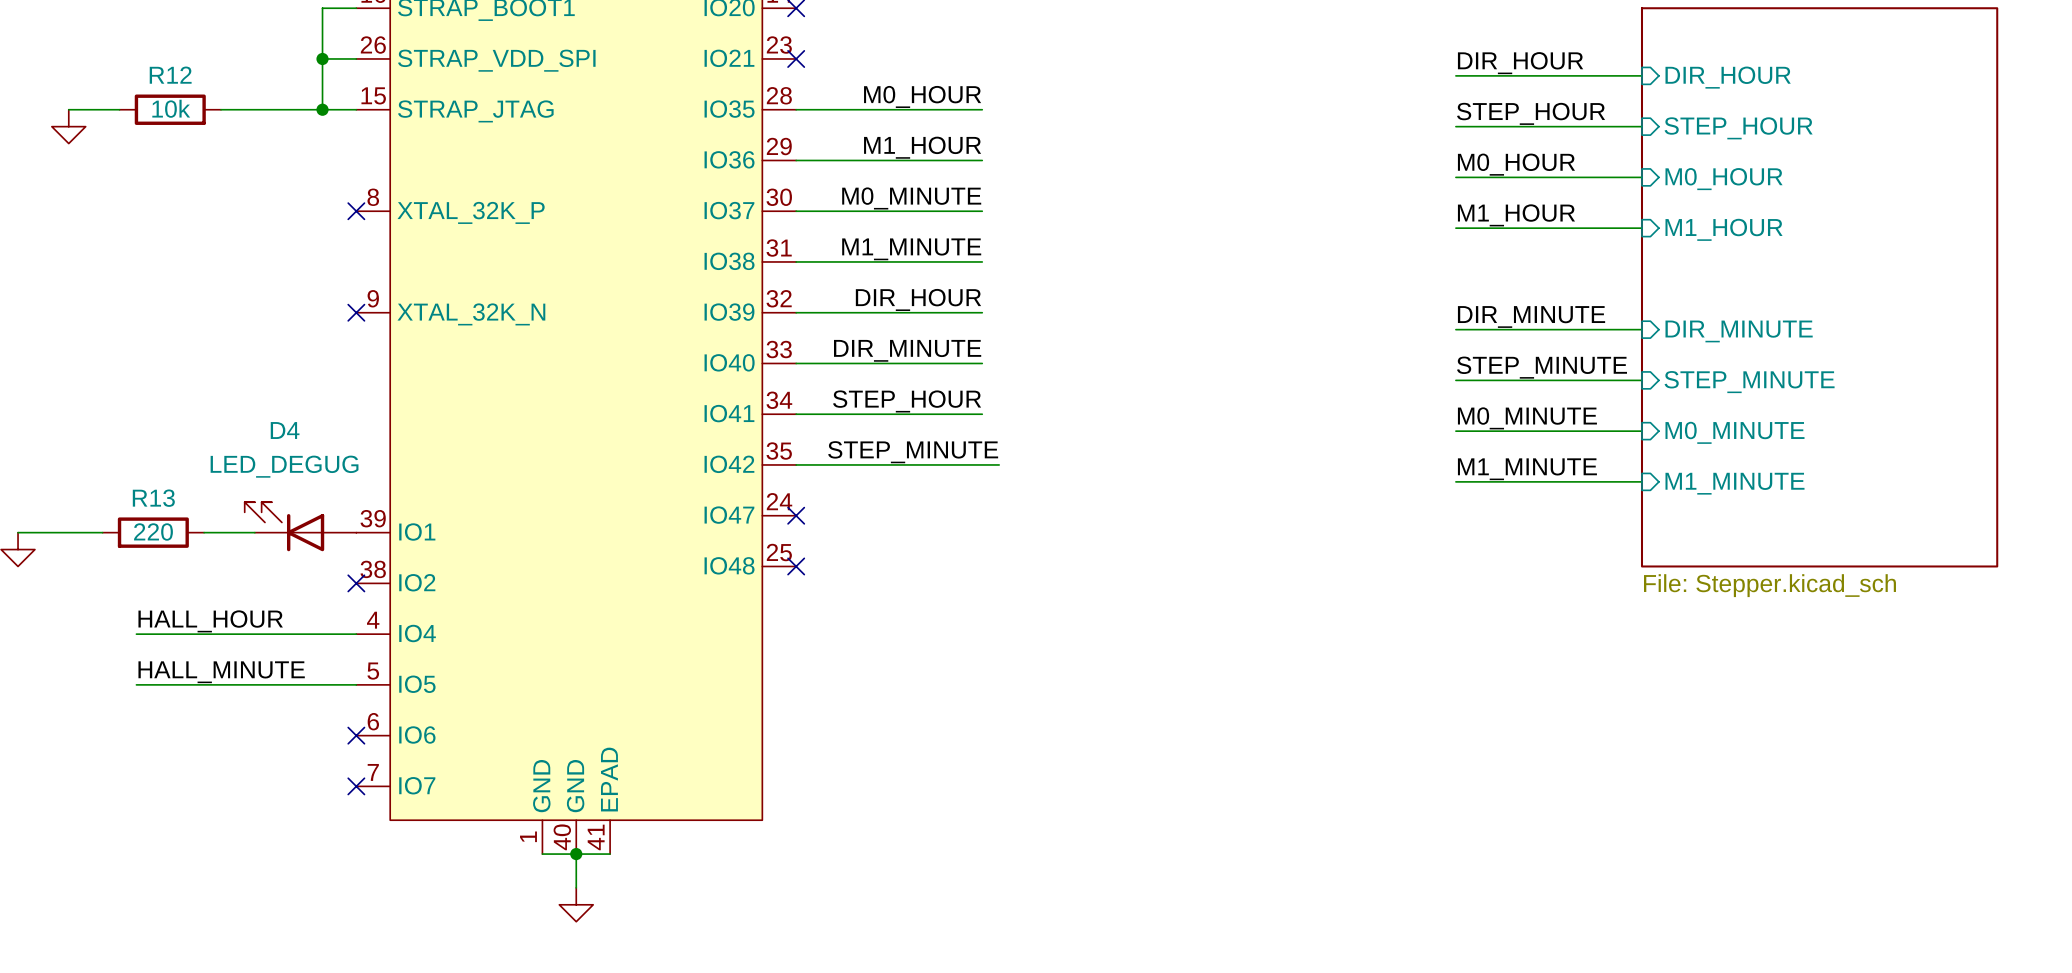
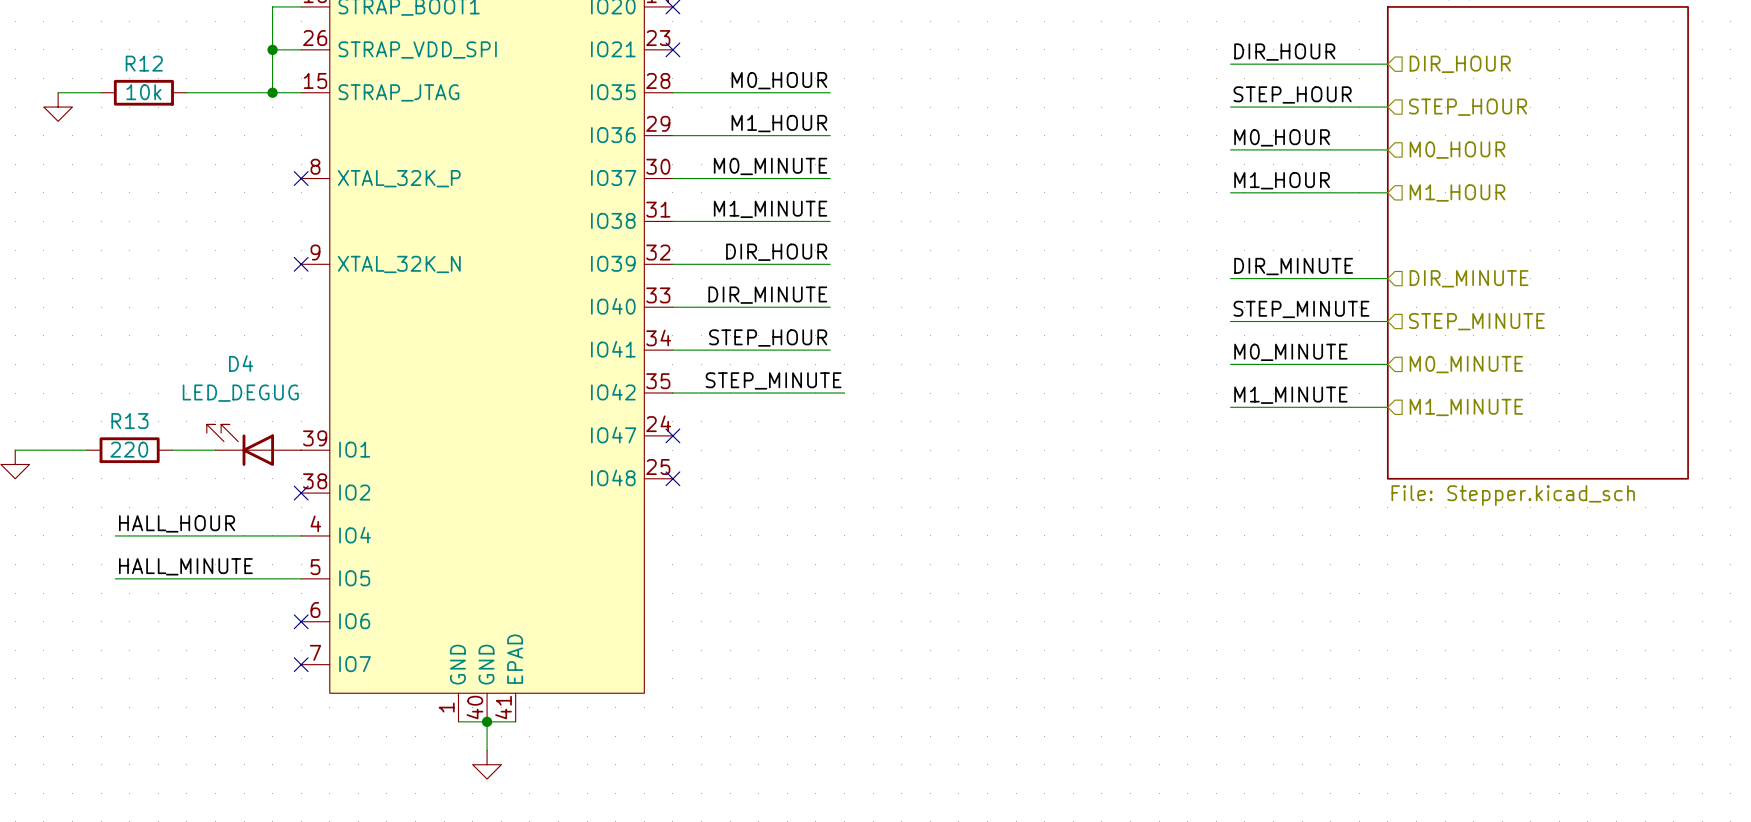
sheet pin: DIR_HOUR (1728, 77) -> none
hierarchical label: none -> DIR_HOUR (1460, 64)
sheet pin: STEP_HOUR (1738, 128) -> none
hierarchical label: none -> STEP_HOUR (1468, 107)
sheet pin: M0_HOUR (1724, 179) -> none
hierarchical label: none -> M0_HOUR (1457, 150)
sheet pin: M1_HOUR (1724, 229) -> none
hierarchical label: none -> M1_HOUR (1457, 192)
sheet pin: DIR_MINUTE (1739, 331) -> none
hierarchical label: none -> DIR_MINUTE (1469, 278)
sheet pin: STEP_MINUTE (1749, 382) -> none
hierarchical label: none -> STEP_MINUTE (1476, 321)
sheet pin: M0_MINUTE (1735, 432) -> none
hierarchical label: none -> M0_MINUTE (1466, 364)
sheet pin: M1_MINUTE (1735, 483) -> none
hierarchical label: none -> M1_MINUTE (1466, 407)

